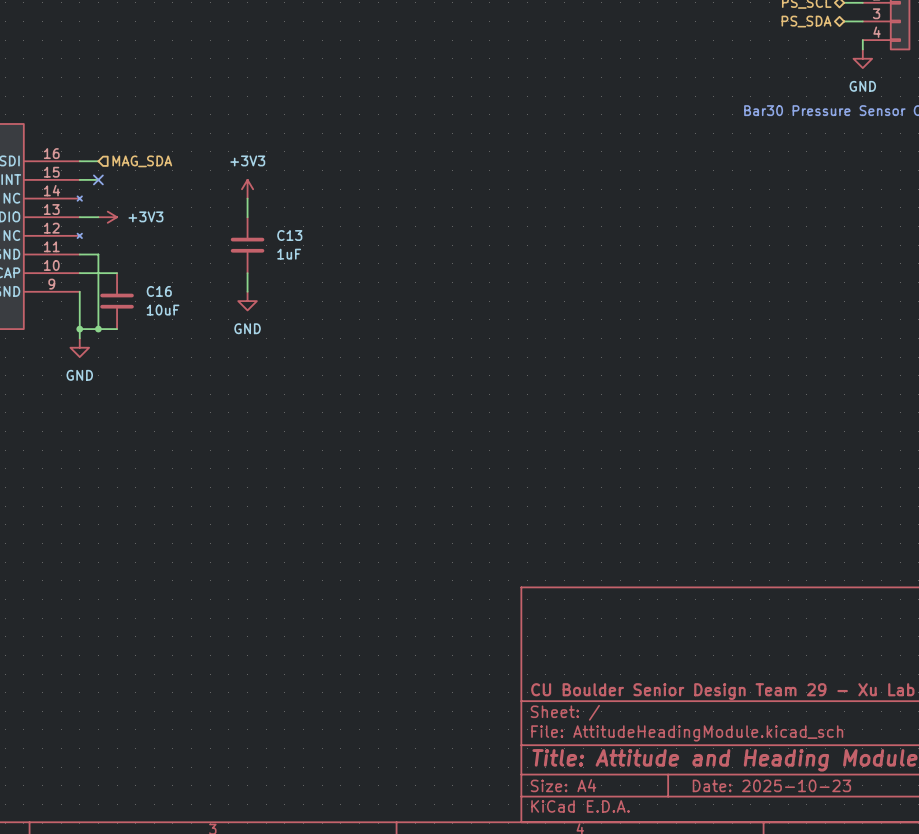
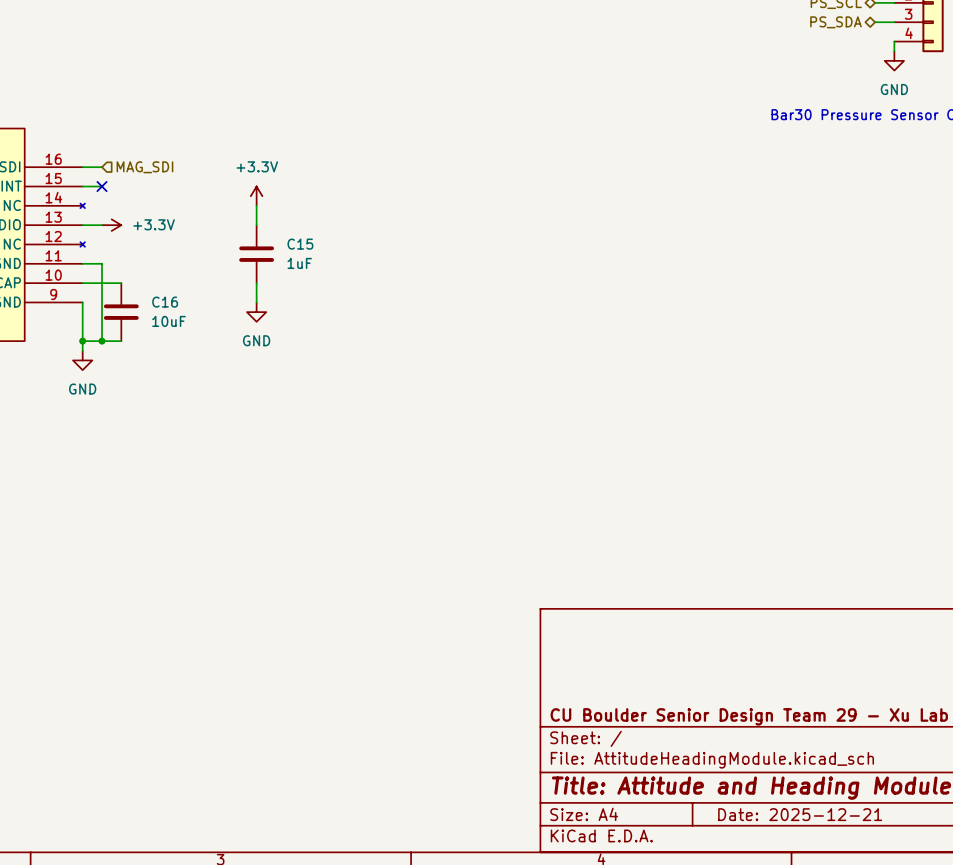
hierarchical label: MAG_SDA (142, 161) -> MAG_SDI (144, 167)
power symbol: +3V3 (247, 189) -> +3.3V (256, 196)
power symbol: +3V3 (107, 217) -> +3.3V (111, 225)
C13 name: C13 (289, 235) -> C15 (300, 244)
title block: Date: 2025-10-23 (771, 785) -> Date: 2025-12-21 (800, 814)

